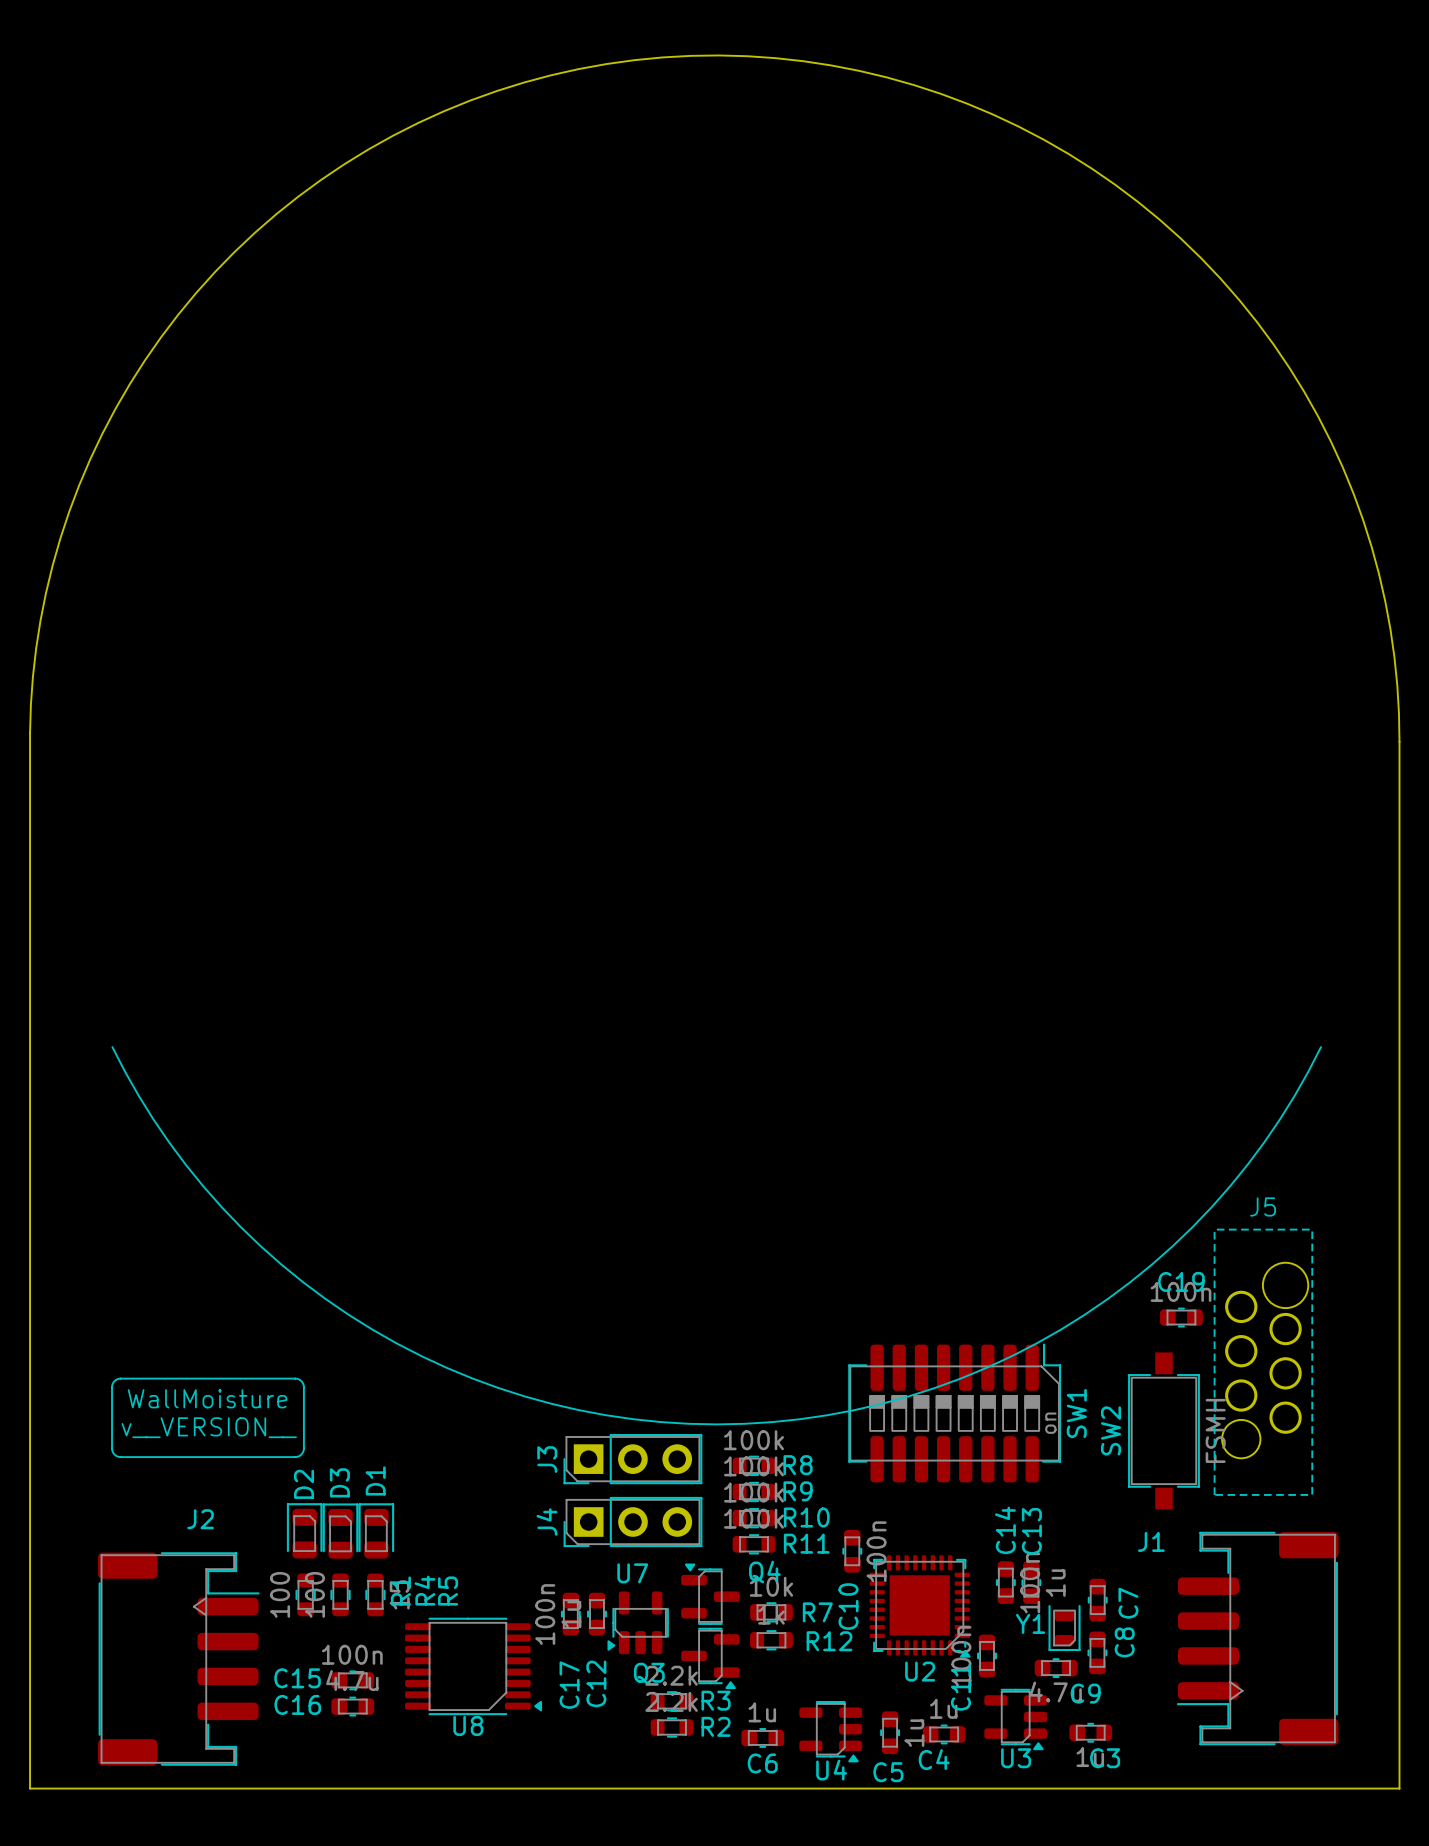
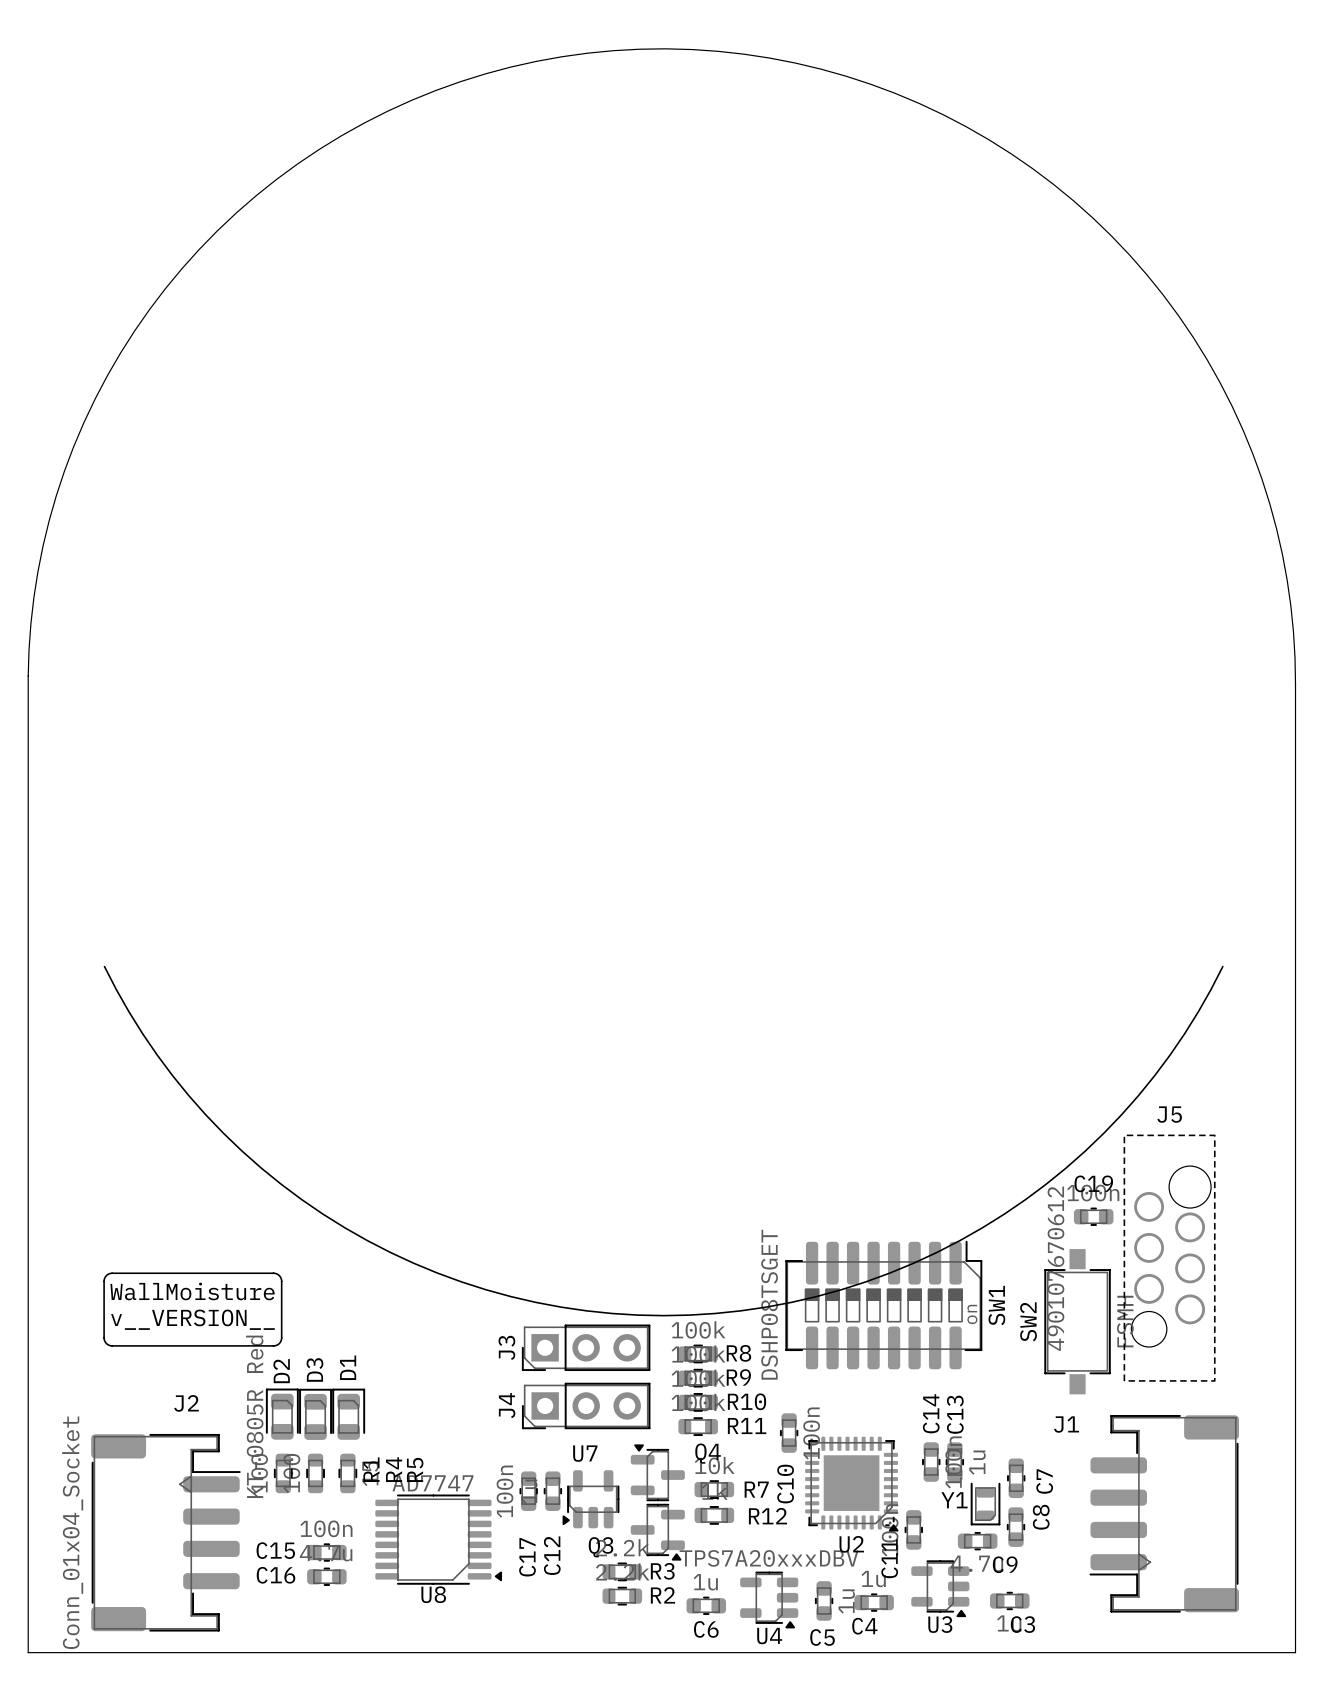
J5 value: none -> 490107670612 (1055, 1268)
SW1 value: none -> DSHP08TSGET (769, 1304)
D2 value: none -> KT-0805R Red (254, 1416)
U8 value: none -> AD7747 (432, 1483)
J2 value: none -> Conn_01x04_Socket (72, 1532)
U4 value: none -> TPS7A20xxxDBV (769, 1558)

